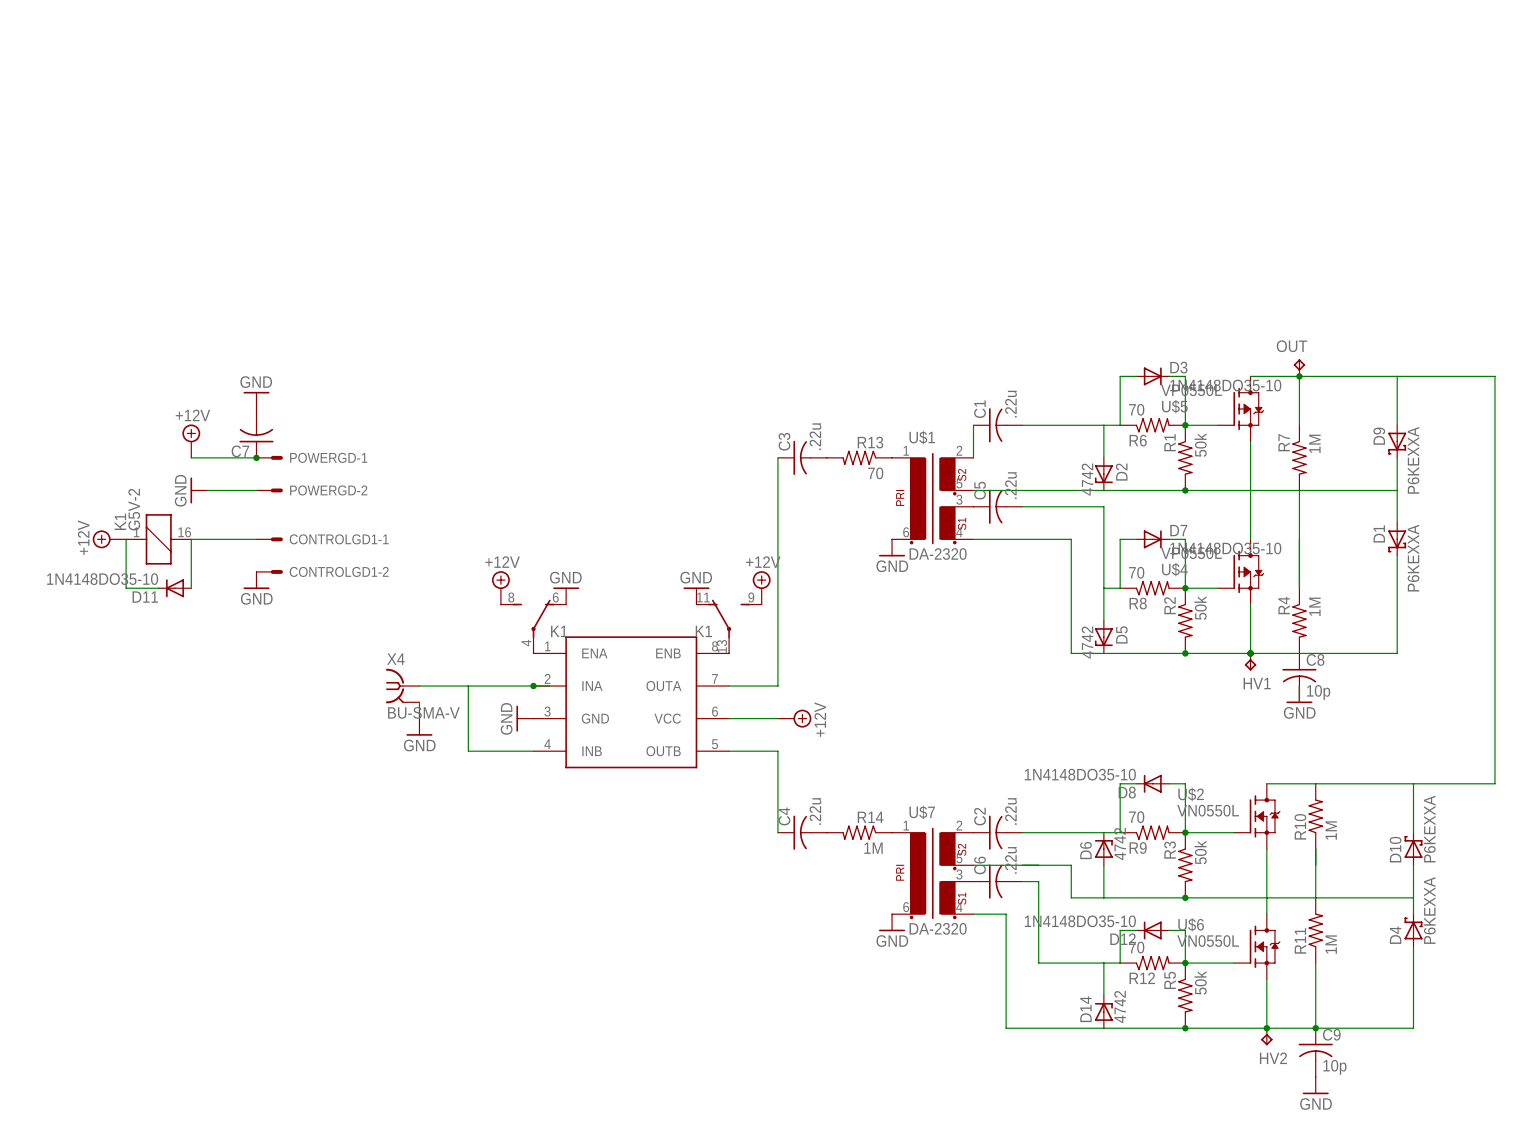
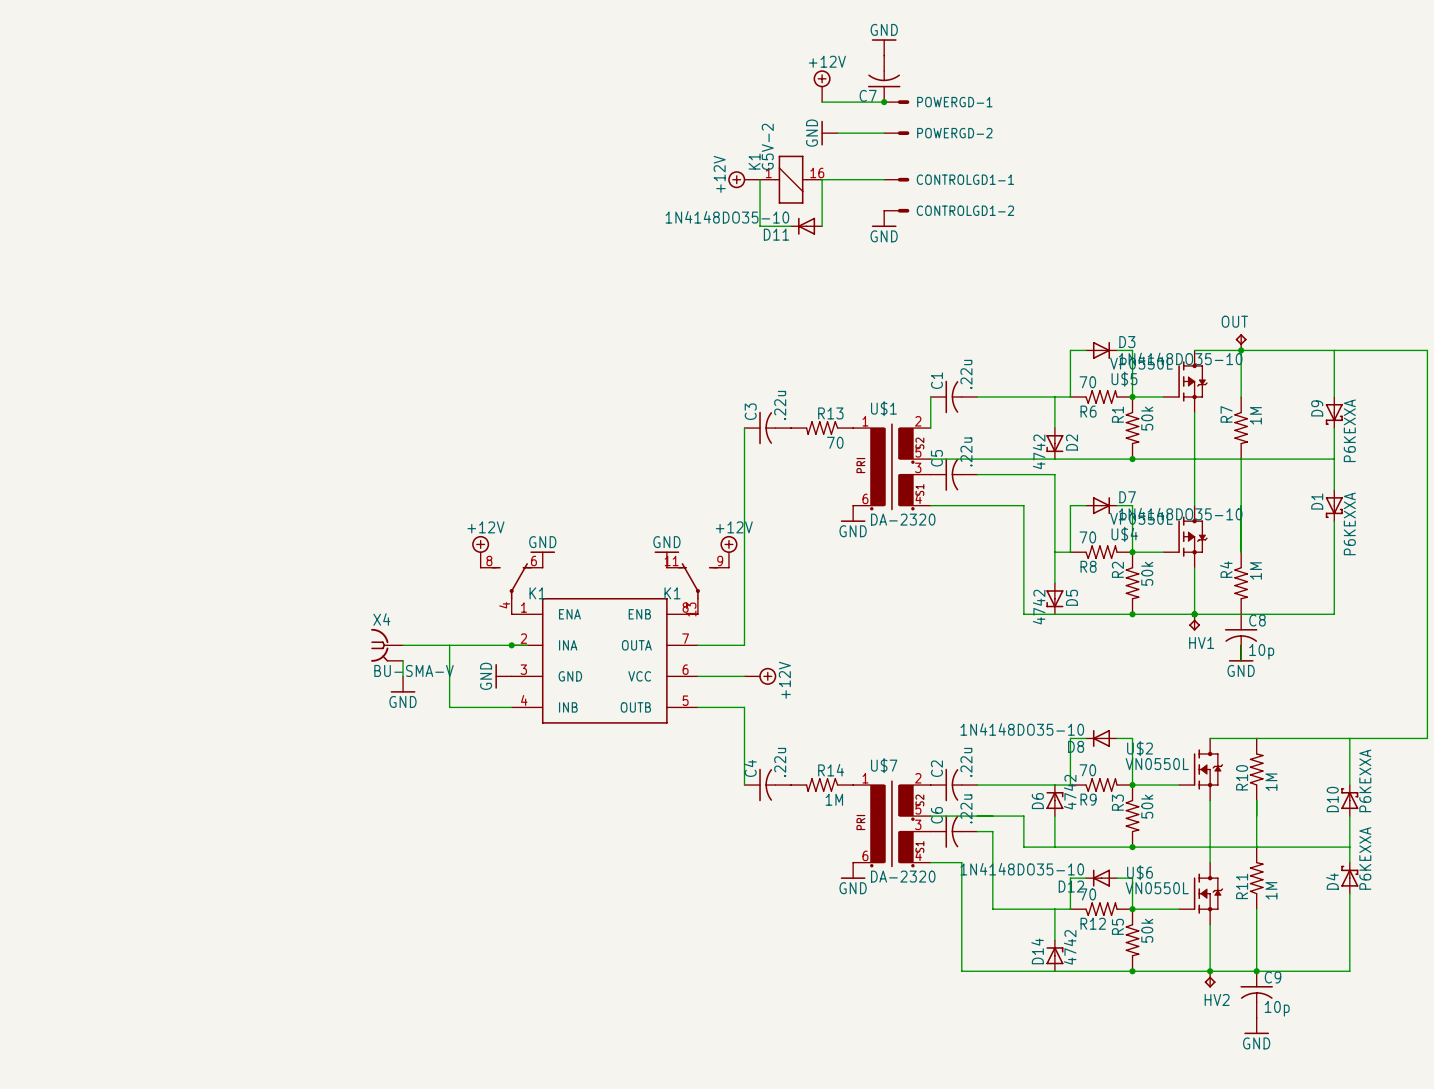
power symbol: none -> GND (884, 47)
power symbol: none -> +12V (822, 86)
wire: none -> (822, 102) (884, 102)
junction: none -> (884, 102)
power symbol: none -> GND (829, 133)
wire: none -> (837, 133) (884, 133)
power symbol: none -> +12V (744, 179)
wire: none -> (760, 179) (760, 226) (791, 226)
K1: none -> G5V-2 (791, 179)
wire: none -> (884, 179) (822, 179) (822, 226)
power symbol: none -> GND (884, 218)
power symbol: GND (256, 400) -> none
C7 position: (256, 433) -> (884, 78)
power symbol: +12V (191, 441) -> none
wire: (191, 457) (256, 457) -> none
junction: (256, 457) -> none
POWERGD-1 position: (269, 457) -> (896, 102)
power symbol: GND (199, 490) -> none
wire: (207, 490) (256, 490) -> none
POWERGD-2 position: (269, 490) -> (896, 133)
power symbol: +12V (109, 539) -> none
wire: (126, 539) (126, 588) (158, 588) -> none
K1: G5V-2 (158, 539) -> none
wire: (256, 539) (191, 539) (191, 588) -> none
CONTROLGD1-1 position: (269, 539) -> (896, 179)
CONTROLGD1-2 position: (269, 571) -> (896, 210)
power symbol: GND (256, 580) -> none
D11 position: (175, 588) -> (806, 226)

